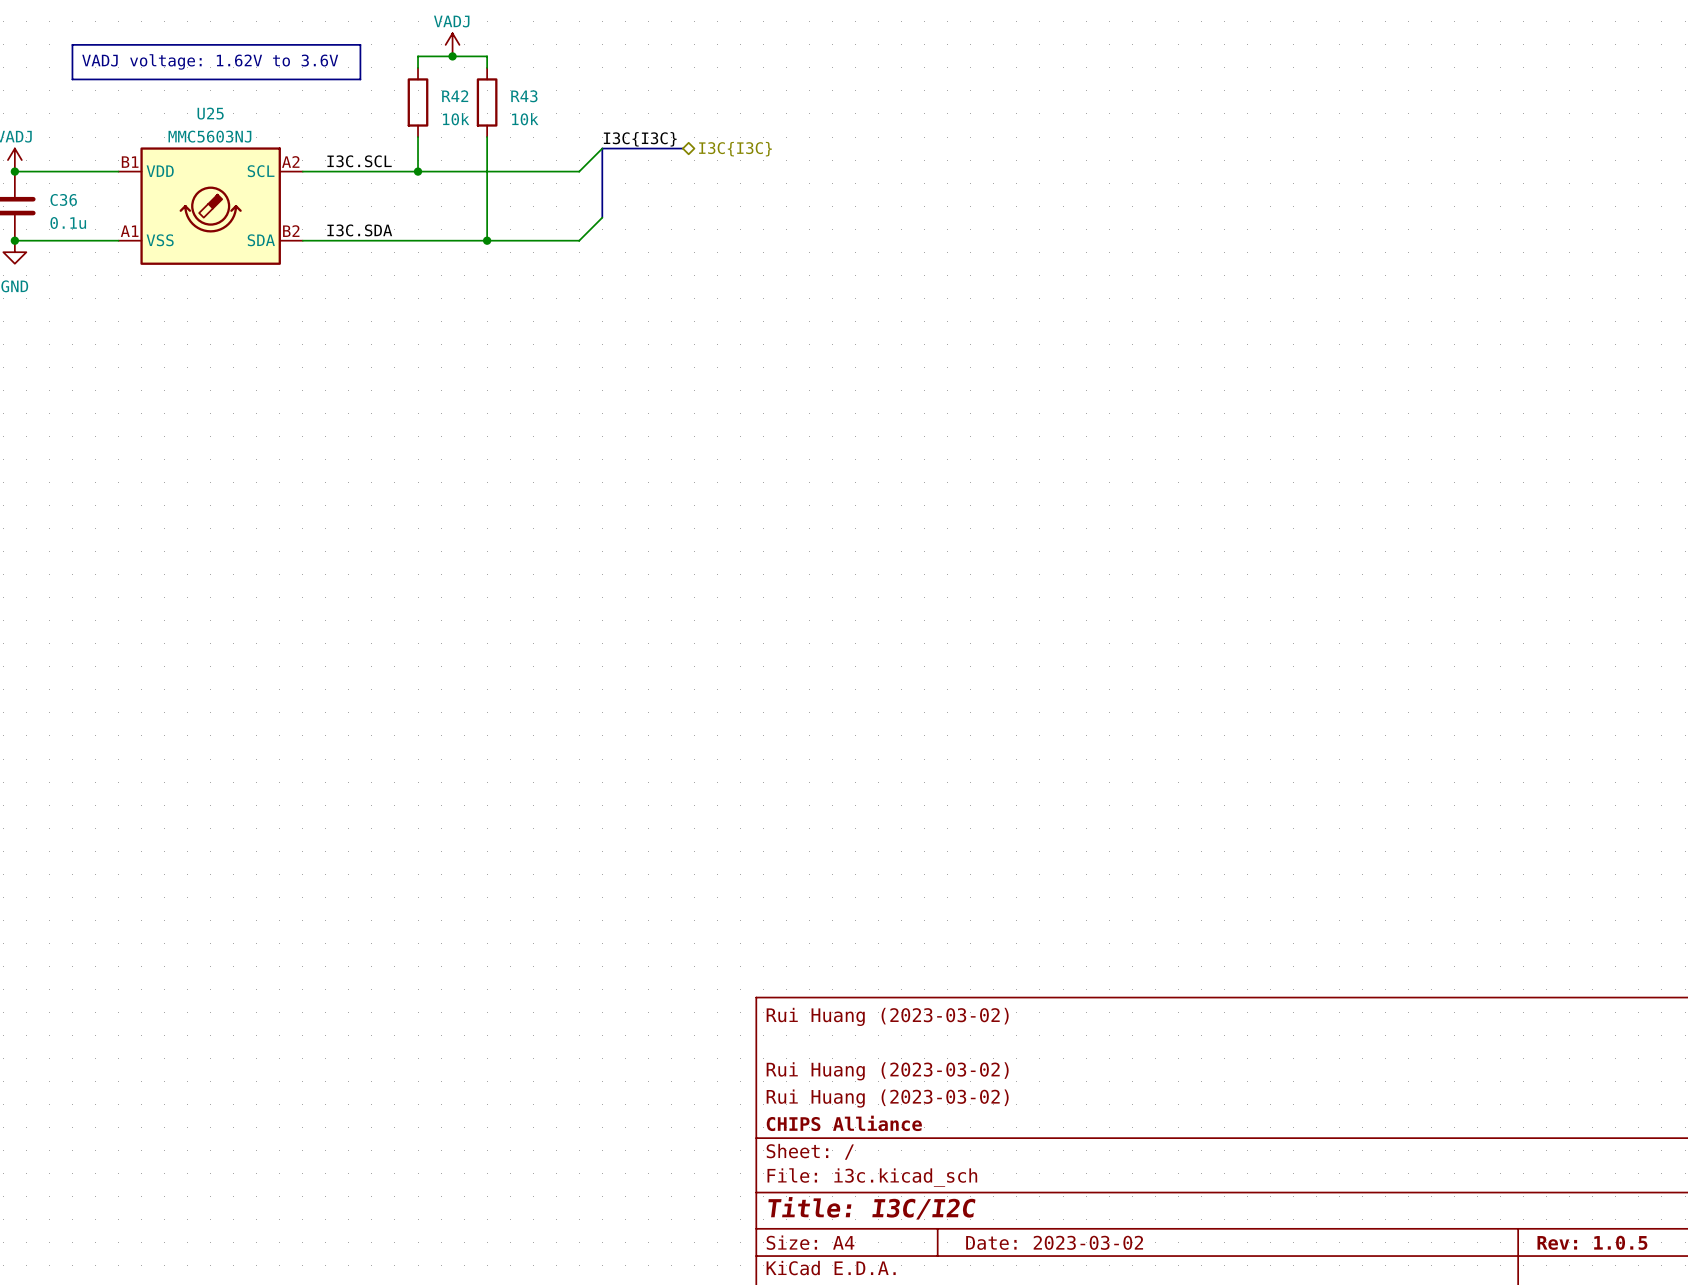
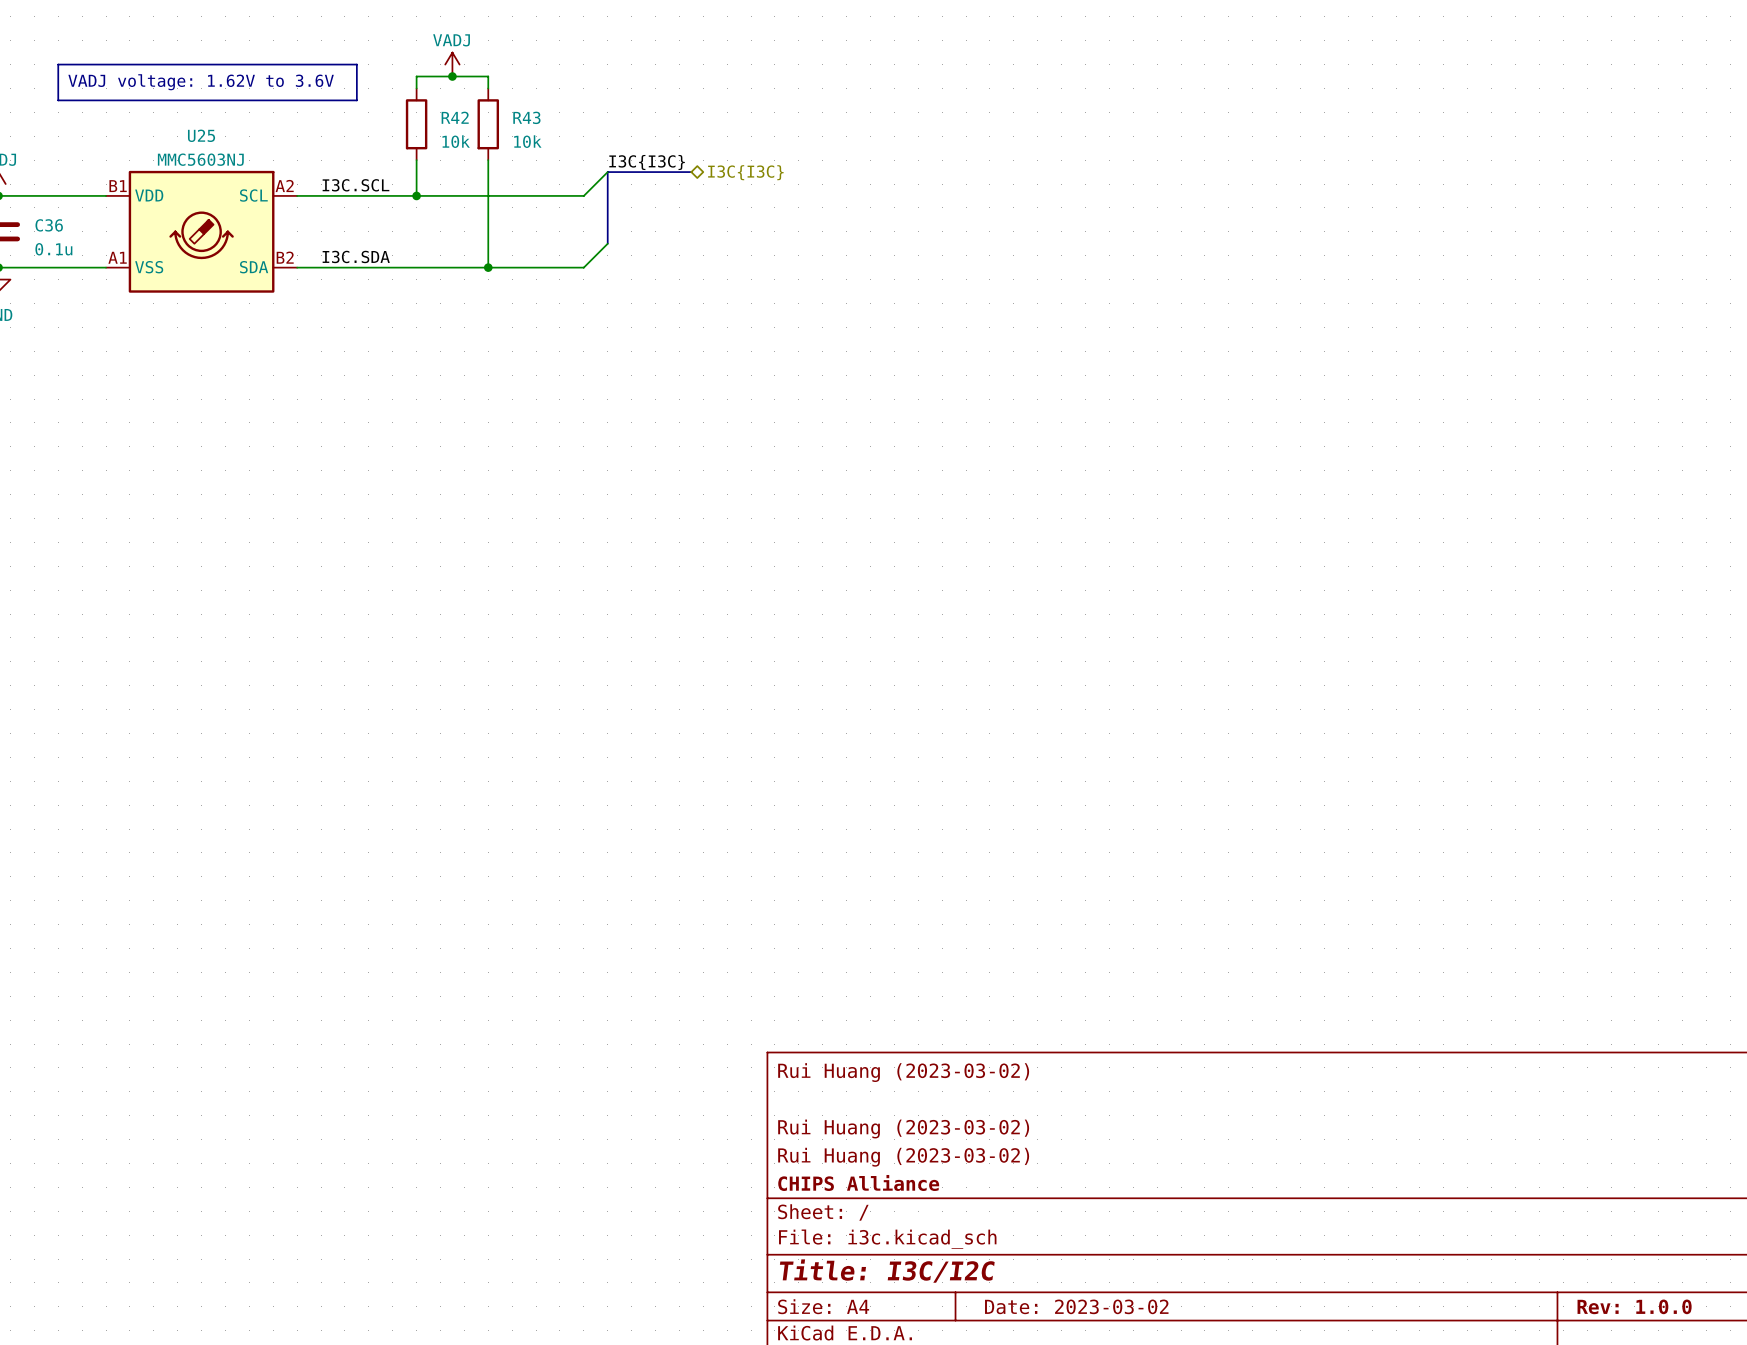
title block: Rev: 1.0.5 (1592, 1242) -> Rev: 1.0.0 (1634, 1306)

